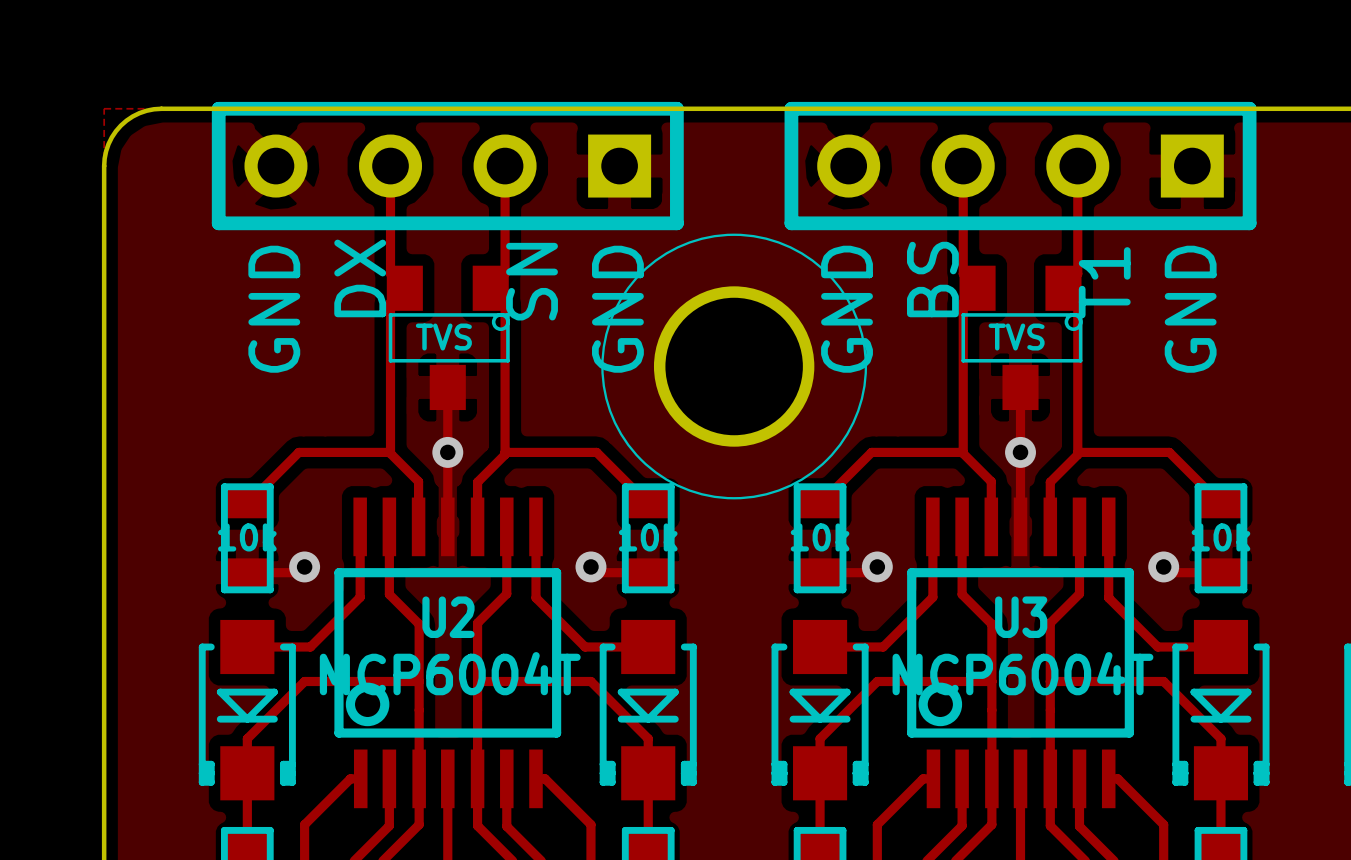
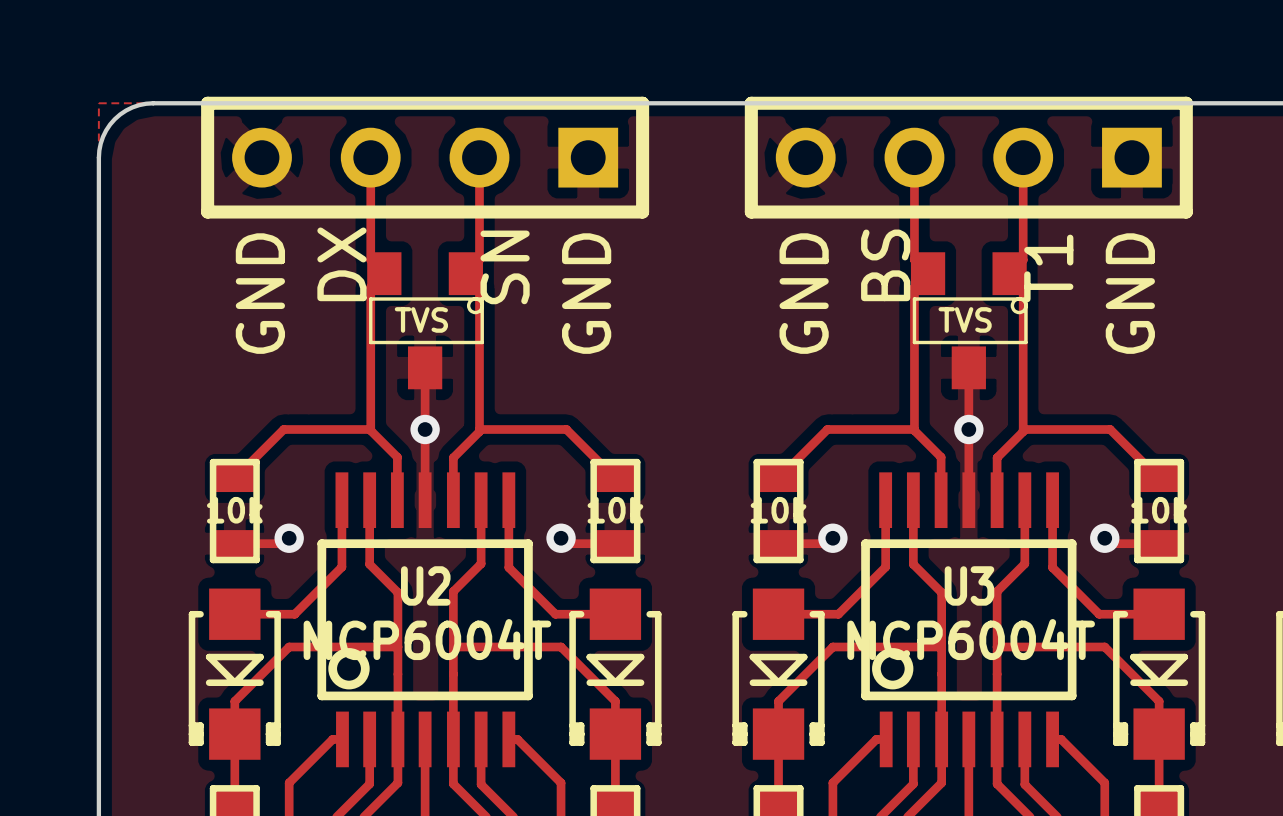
part: (734, 366) -> none

